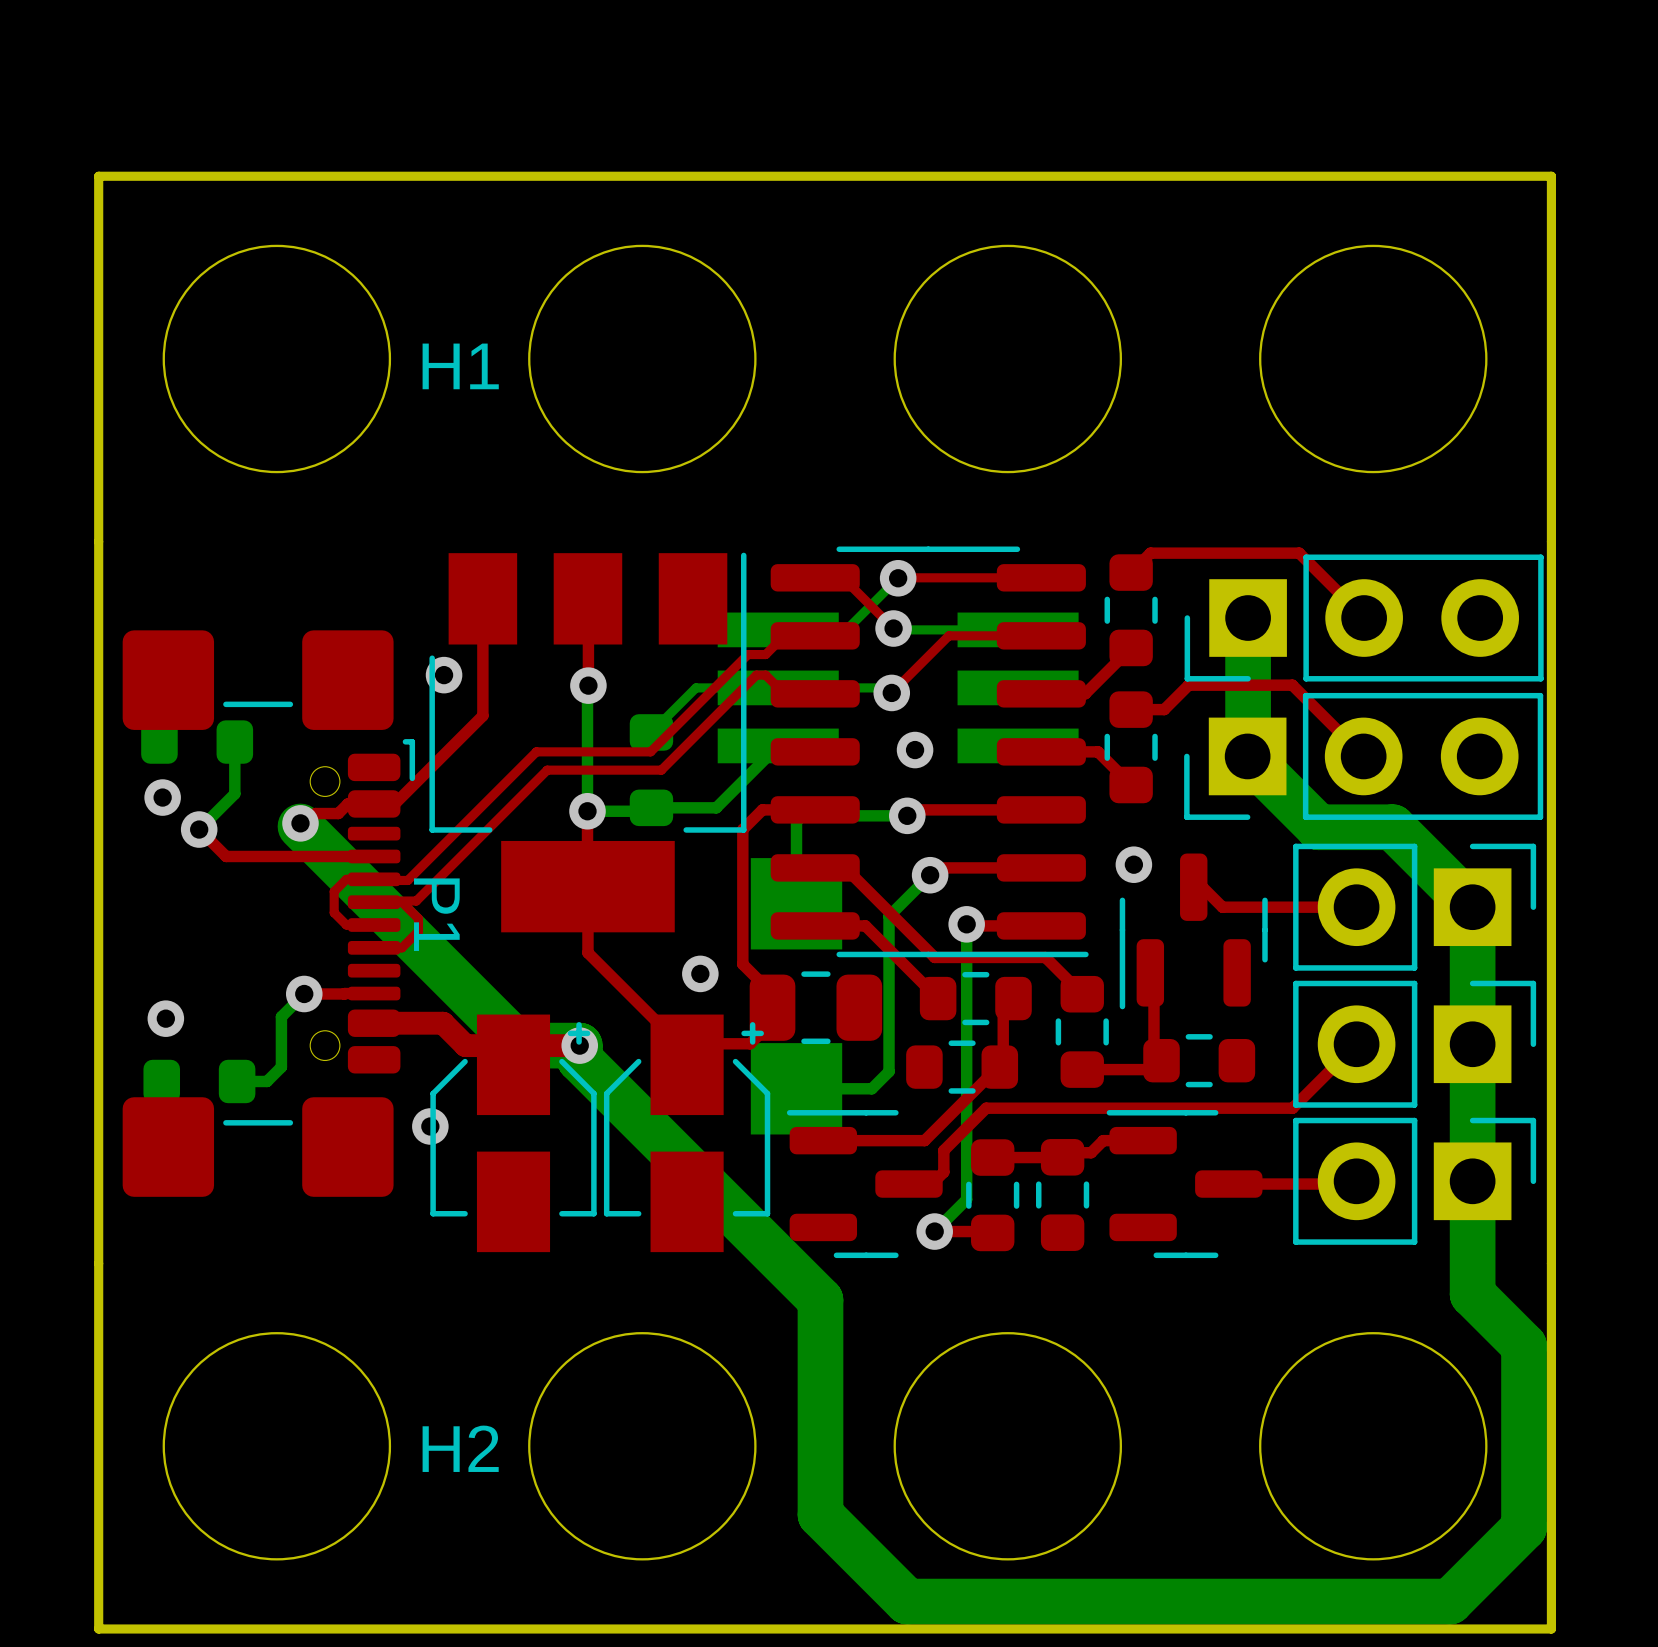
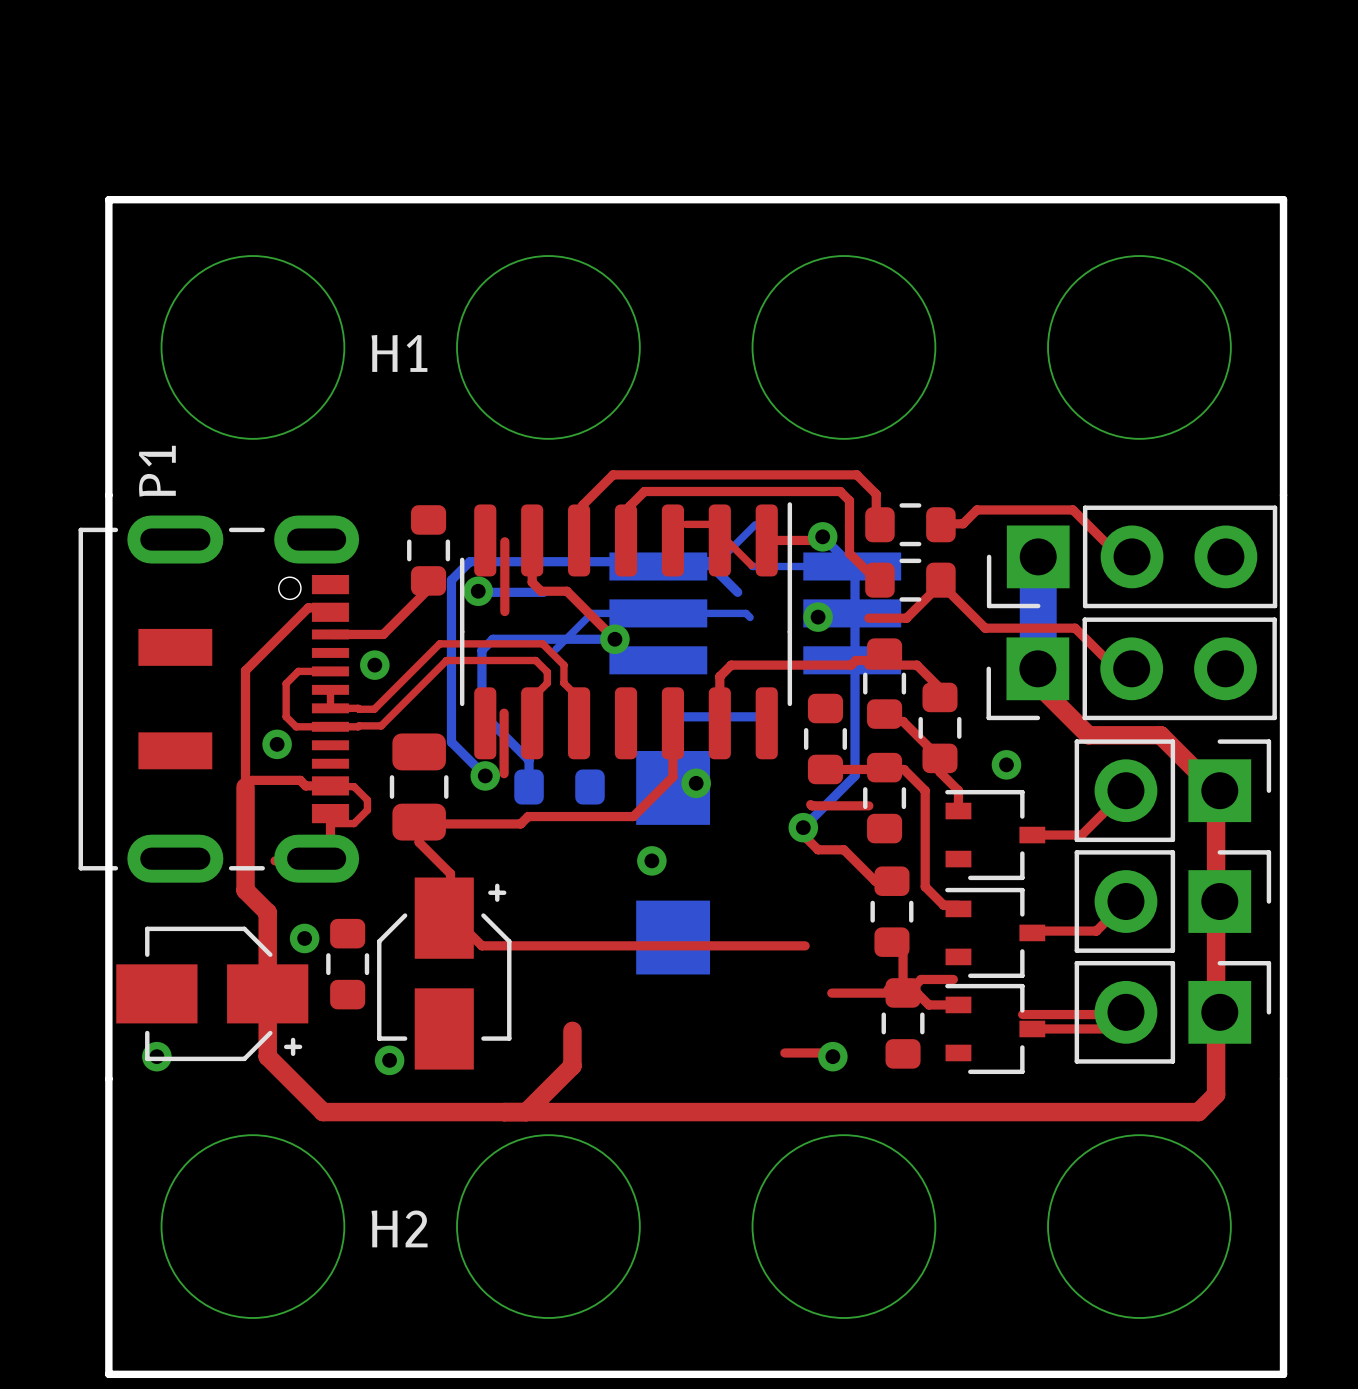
top track: (1131, 572) (1150, 553) (1299, 553) (1364, 618) -> none
top track: (898, 577) (1038, 577) -> none
top track: none -> (936, 523) (963, 523) (976, 509) (1072, 509) (1124, 561)
via: (898, 578) -> none
top track: none -> (876, 524) (876, 494) (856, 474) (613, 474) (582, 505) (582, 540)
part: none -> (910, 524)
top track: none -> (822, 536) (819, 540) (766, 540)
bottom track: none -> (822, 536) (855, 569) (855, 775) (803, 827)
via: none -> (822, 536)
top track: none -> (532, 540) (532, 582) (541, 591) (566, 591) (614, 639)
top track: none -> (629, 540) (629, 506) (644, 491) (840, 491) (849, 500) (849, 553) (876, 580)
top track: (482, 598) (482, 715) (394, 803) (347, 803) (338, 813) (315, 813) (305, 823) (300, 823) -> none
part: (1131, 610) -> none
via: (893, 628) -> none
P1 footprint: [122, 630, 416, 1197] -> [78, 515, 360, 883]
top track: (784, 635) (765, 654) (747, 654) (650, 751) (536, 751) (407, 880) (346, 879) (334, 891) (334, 912) (346, 925) (374, 925) -> none
top track: (1038, 635) (948, 635) (891, 692) -> none
part: none -> (910, 580)
top track: none -> (937, 580) (985, 628) (1075, 628) (1126, 679)
top track: none -> (428, 589) (383, 634) (330, 634)
bottom track: none -> (478, 591) (543, 592)
bottom track: none -> (737, 592) (707, 561) (469, 561) (451, 580) (451, 742) (485, 775)
via: (444, 675) -> none
top track: none -> (326, 607) (308, 607) (245, 670) (245, 787)
bottom track: (588, 685) (587, 811) (648, 811) (651, 807) (716, 807) (778, 745) -> none
via position: (588, 685) -> (478, 591)
via: (891, 692) -> none
via: none -> (818, 617)
top track: (784, 693) (765, 675) (756, 675) (661, 770) (547, 770) (416, 901) (393, 902) -> none
top track: (1131, 709) (1164, 709) (1188, 685) (1292, 685) (1363, 756) -> none
bottom track: none -> (614, 639) (493, 639) (481, 650) (481, 713) (529, 760) (529, 787)
via: none -> (614, 639)
part side: bottom (197, 742) -> top (428, 550)
bottom track: (234, 742) (234, 793) (199, 829) -> none
part: (587, 742) -> none
top track: none -> (884, 660) (855, 660) (851, 665) (731, 665) (719, 676) (719, 723)
part: (1131, 747) -> none
via: (915, 750) -> none
via: none -> (374, 665)
part rotation: 0° (929, 751) -> 90° counterclockwise (626, 630)
bottom track: (1247, 756) (1318, 827) (1392, 827) (1472, 907) (1472, 1294) (1524, 1345) (1524, 1527) (1450, 1601) (907, 1601) (820, 1514) (820, 1300) (579, 1059) (579, 1045) (519, 1045) (300, 826) -> none
top track: none -> (330, 671) (298, 671) (286, 683) (286, 716) (296, 726) (381, 725) (446, 660) (535, 660) (547, 672) (547, 683) (532, 698)
part rotation: 0° (651, 770) -> 90° clockwise (559, 787)
part position: (651, 770) -> (559, 787)
top track: none -> (1033, 679) (1088, 735) (1160, 735) (1216, 790) (1216, 1094) (1198, 1112) (323, 1112) (267, 1056) (267, 912) (245, 890) (245, 787)
part: none -> (884, 683)
top track: none -> (330, 689) (330, 708) (374, 709) (439, 643) (542, 643) (563, 665) (563, 683) (579, 698)
via: (162, 797) -> none
top track: (812, 809) (762, 809) (742, 829) (742, 964) (786, 1007) (750, 1043) (678, 1043) (587, 952) (587, 886) -> none
top track: (1041, 809) (913, 809) (907, 815) -> none
via: (587, 811) -> none
via: (907, 815) -> none
top track: none -> (884, 721) (903, 721) (939, 758) (939, 772) (958, 790) (958, 807)
via position: (300, 823) -> (277, 744)
top track: none -> (672, 723) (672, 777) (633, 816) (528, 816) (520, 823) (420, 823)
top track: (199, 829) (226, 856) (374, 856) -> none
via: (199, 829) -> none
part: none -> (939, 727)
part: none -> (825, 738)
part footprint: [1119, 853, 1268, 1010] -> [945, 789, 1046, 881]
via position: (1133, 864) -> (1006, 764)
top track: (812, 867) (845, 867) (934, 957) (1045, 957) (1082, 994) -> none
top track: (1041, 867) (937, 867) (930, 875) -> none
bottom track: (930, 875) (889, 916) (889, 1071) (871, 1088) (796, 1088) -> none
via: (930, 875) -> none
top track: none -> (825, 769) (903, 769) (925, 790) (925, 886) (943, 905) (958, 905)
top track: (1193, 887) (1202, 887) (1222, 907) (1356, 907) -> (1036, 835) (1081, 835) (1125, 790)
via: none -> (485, 775)
via: none -> (696, 783)
top track: none -> (322, 785) (305, 785) (300, 780) (252, 780) (245, 787)
P1 name position: P1 (436, 914) -> P1 (157, 471)
part: none -> (884, 798)
bottom track: (966, 924) (966, 1199) (934, 1231) -> none
via position: (966, 924) -> (803, 827)
top track: (812, 925) (865, 925) (938, 998) -> none
top track: none -> (330, 813) (330, 844)
top track: none -> (419, 822) (419, 842) (450, 873) (450, 914) (481, 945) (805, 945)
top track: none -> (803, 827) (803, 835) (818, 849) (843, 849) (875, 881) (903, 881)
top track: (1150, 972) (1153, 976) (1153, 1063) (1148, 1069) (1082, 1069) -> none
via: (700, 973) -> none
bottom track: (304, 993) (281, 1016) (281, 1067) (267, 1081) (237, 1081) -> none
via: (304, 993) -> none
via: none -> (651, 860)
part: (975, 998) -> none
top track: (1013, 998) (1003, 1008) (1003, 1062) (924, 1140) (814, 1140) -> none
part rotation: 0° (815, 1007) -> 90° clockwise (419, 787)
part position: (815, 1007) -> (419, 787)
via: (165, 1018) -> none
top track: (374, 1023) (443, 1023) (465, 1045) (579, 1045) -> none
part position: (1082, 1031) -> (891, 911)
part footprint: [1143, 1034, 1256, 1088] -> [945, 887, 1046, 978]
via: (579, 1045) -> none
part: (962, 1067) -> none
top track: (1320, 1080) (1292, 1108) (986, 1108) (943, 1150) (943, 1172) (931, 1184) (899, 1184) -> (1096, 931) (1034, 931)
part side: bottom (199, 1081) -> top (347, 964)
via: none -> (304, 938)
top track: none -> (903, 942) (903, 992) (916, 992) (928, 1004) (958, 1004)
part footprint: [1106, 1110, 1263, 1259] -> [945, 983, 1046, 1075]
via: (430, 1126) -> none
part rotation: 0° (687, 1133) -> 90° clockwise (212, 993)
part position: (687, 1133) -> (212, 993)
part: (864, 1184) -> none
part: (992, 1195) -> none
part position: (1062, 1195) -> (903, 1023)
top track: none -> (1032, 1028) (1109, 1028)
top track: none -> (572, 1030) (572, 1065) (526, 1112)
via position: (934, 1231) -> (832, 1056)
via: none -> (156, 1056)
via: none -> (389, 1060)

